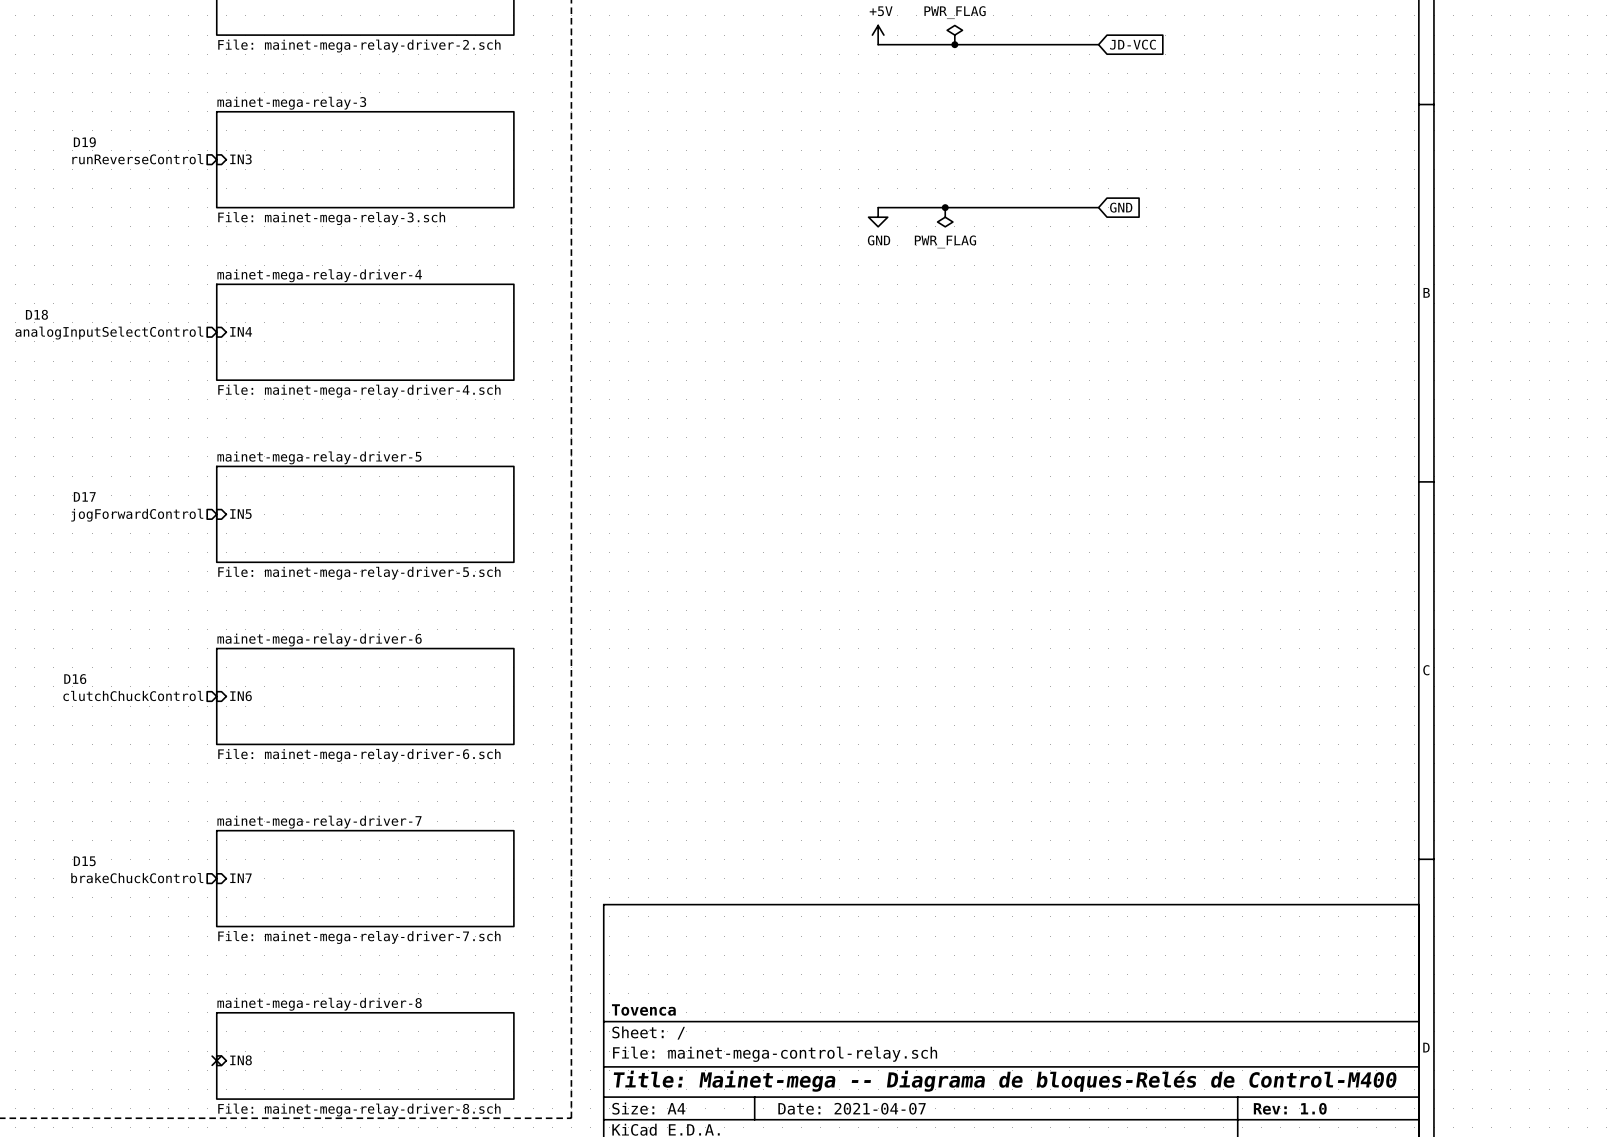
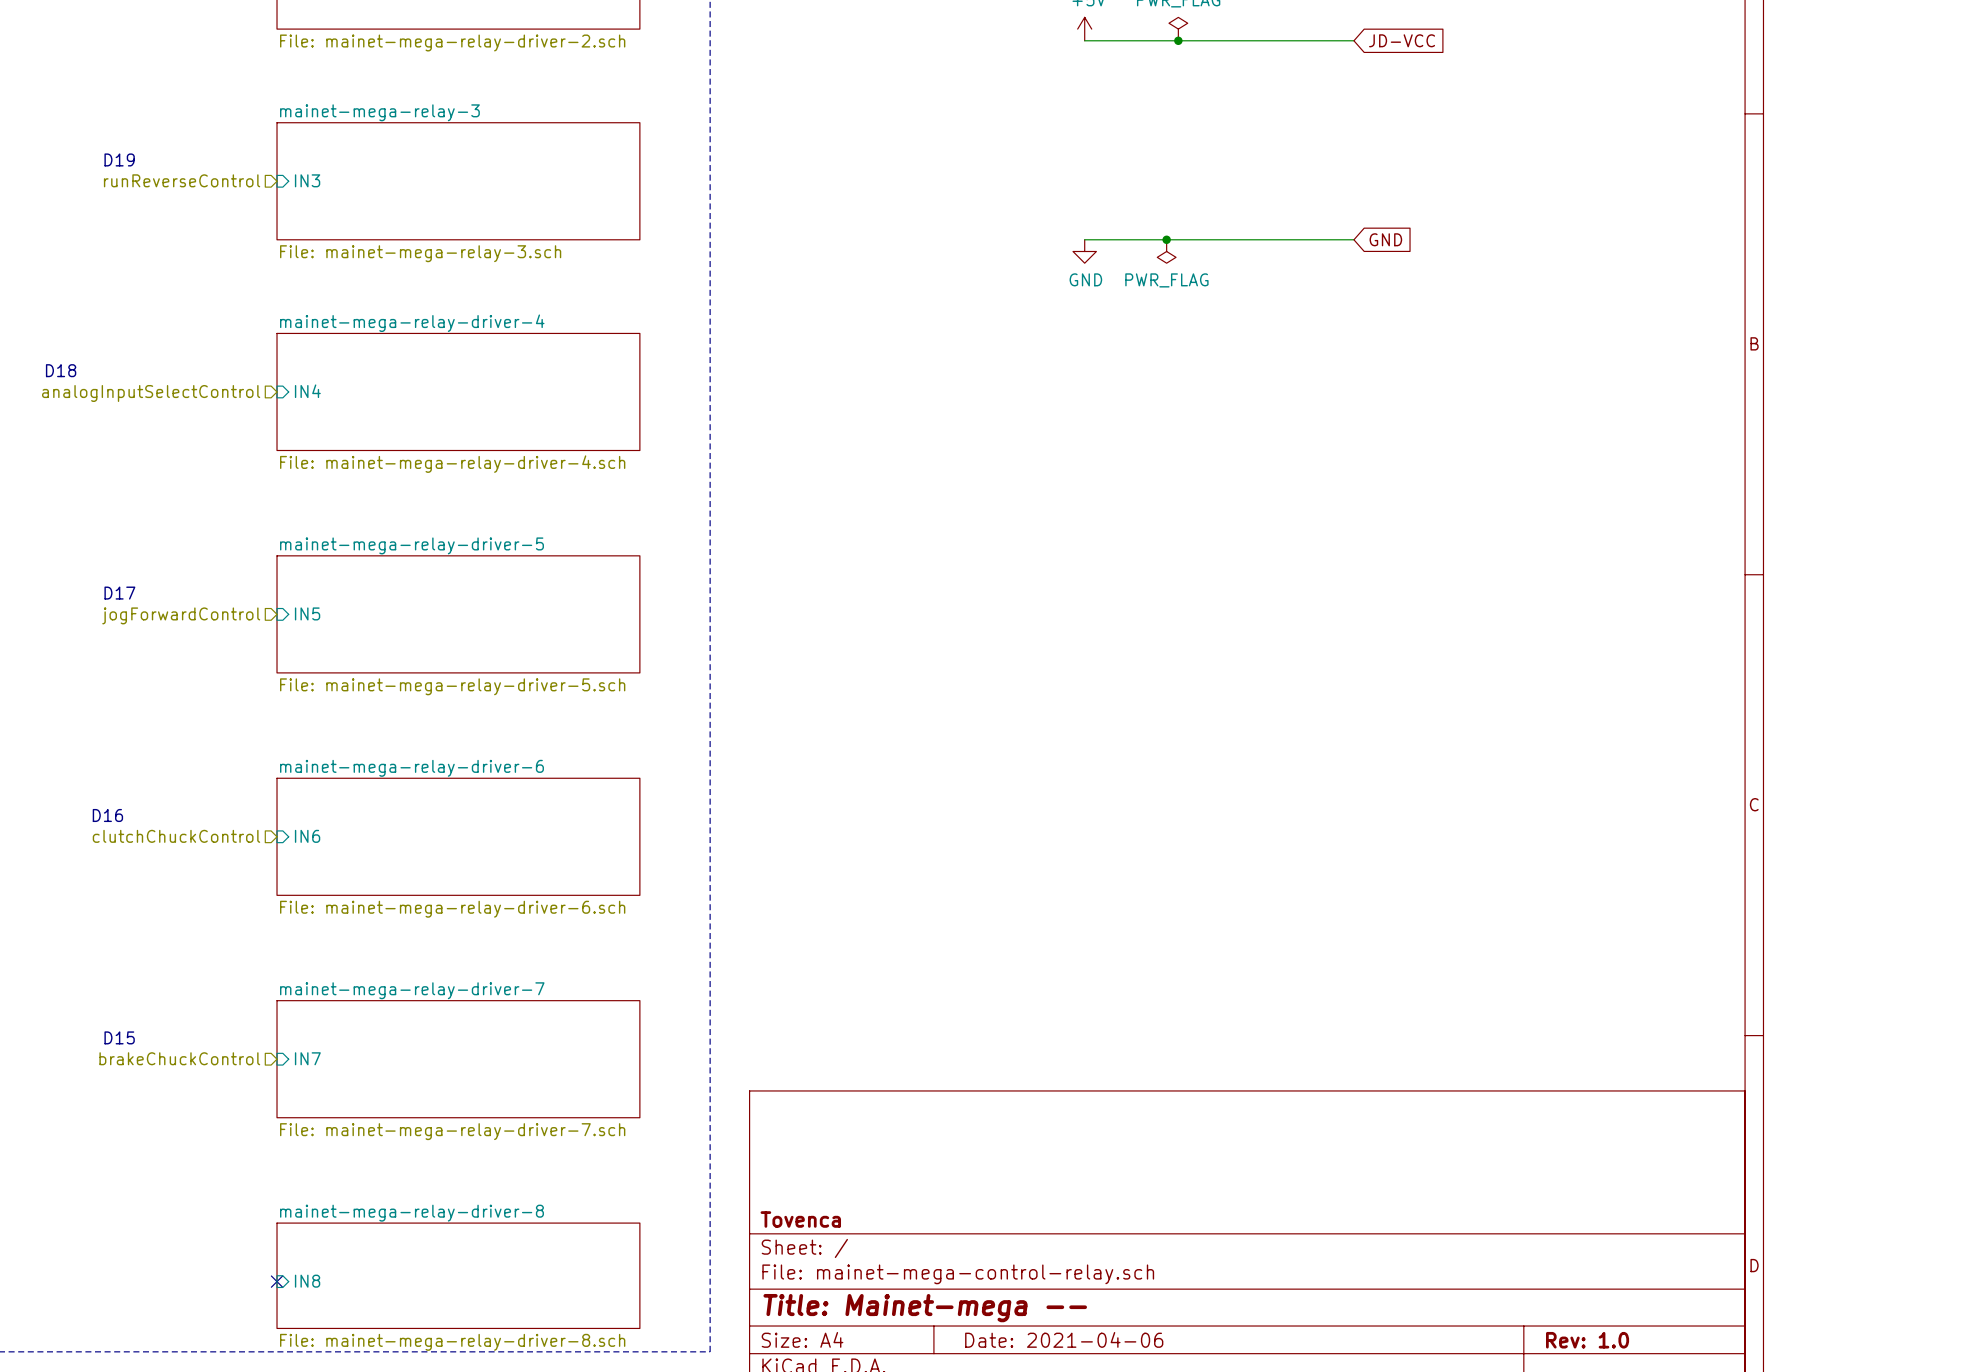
title block: Title: Mainet-mega -- Diagrama de bloques-Relés de Control-M400 (1005, 1081) -> Title: Mainet-mega -- (925, 1308)
title block: Date: 2021-04-07 (852, 1108) -> Date: 2021-04-06 (1064, 1339)

